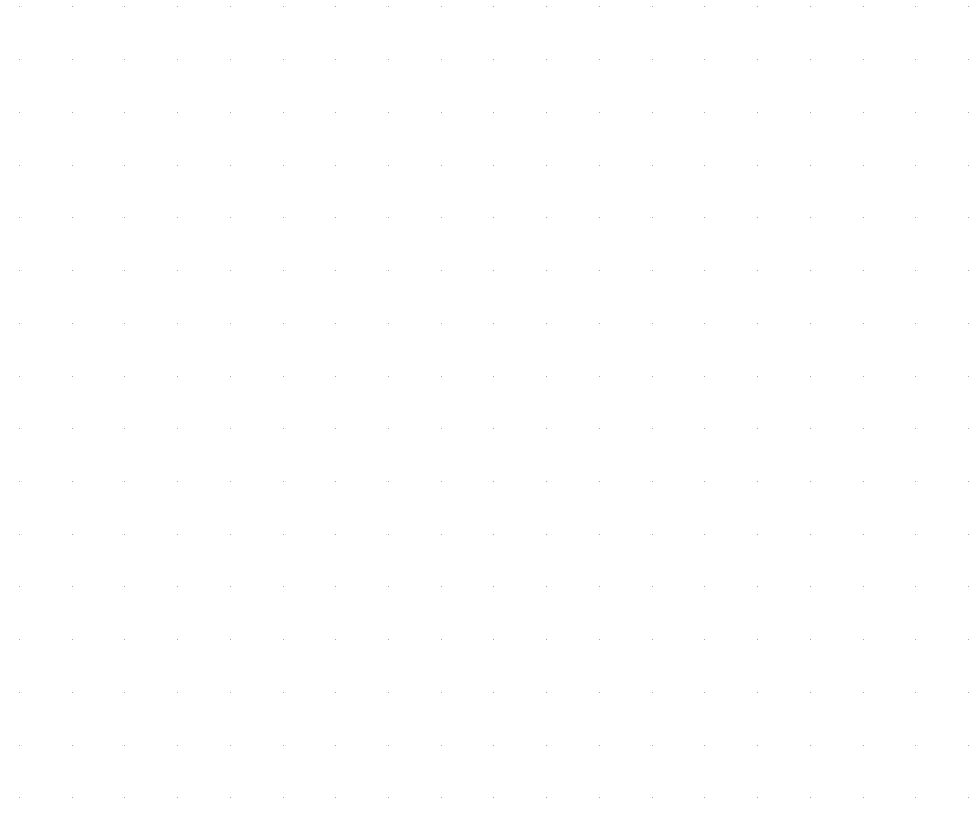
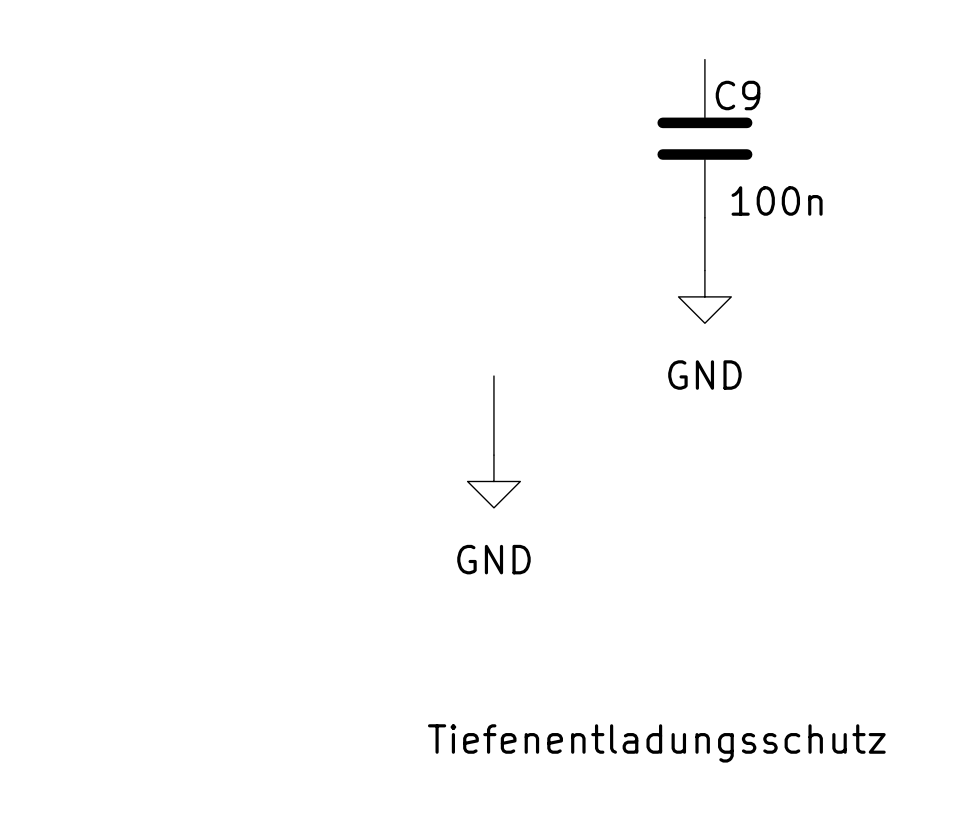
C9: none -> 100n (704, 138)
wire: none -> (704, 217) (704, 270)
power symbol: none -> GND (704, 296)
wire: none -> (493, 376) (493, 455)
power symbol: none -> GND (493, 481)
text: none -> Tiefenentladungsschutz (656, 743)

